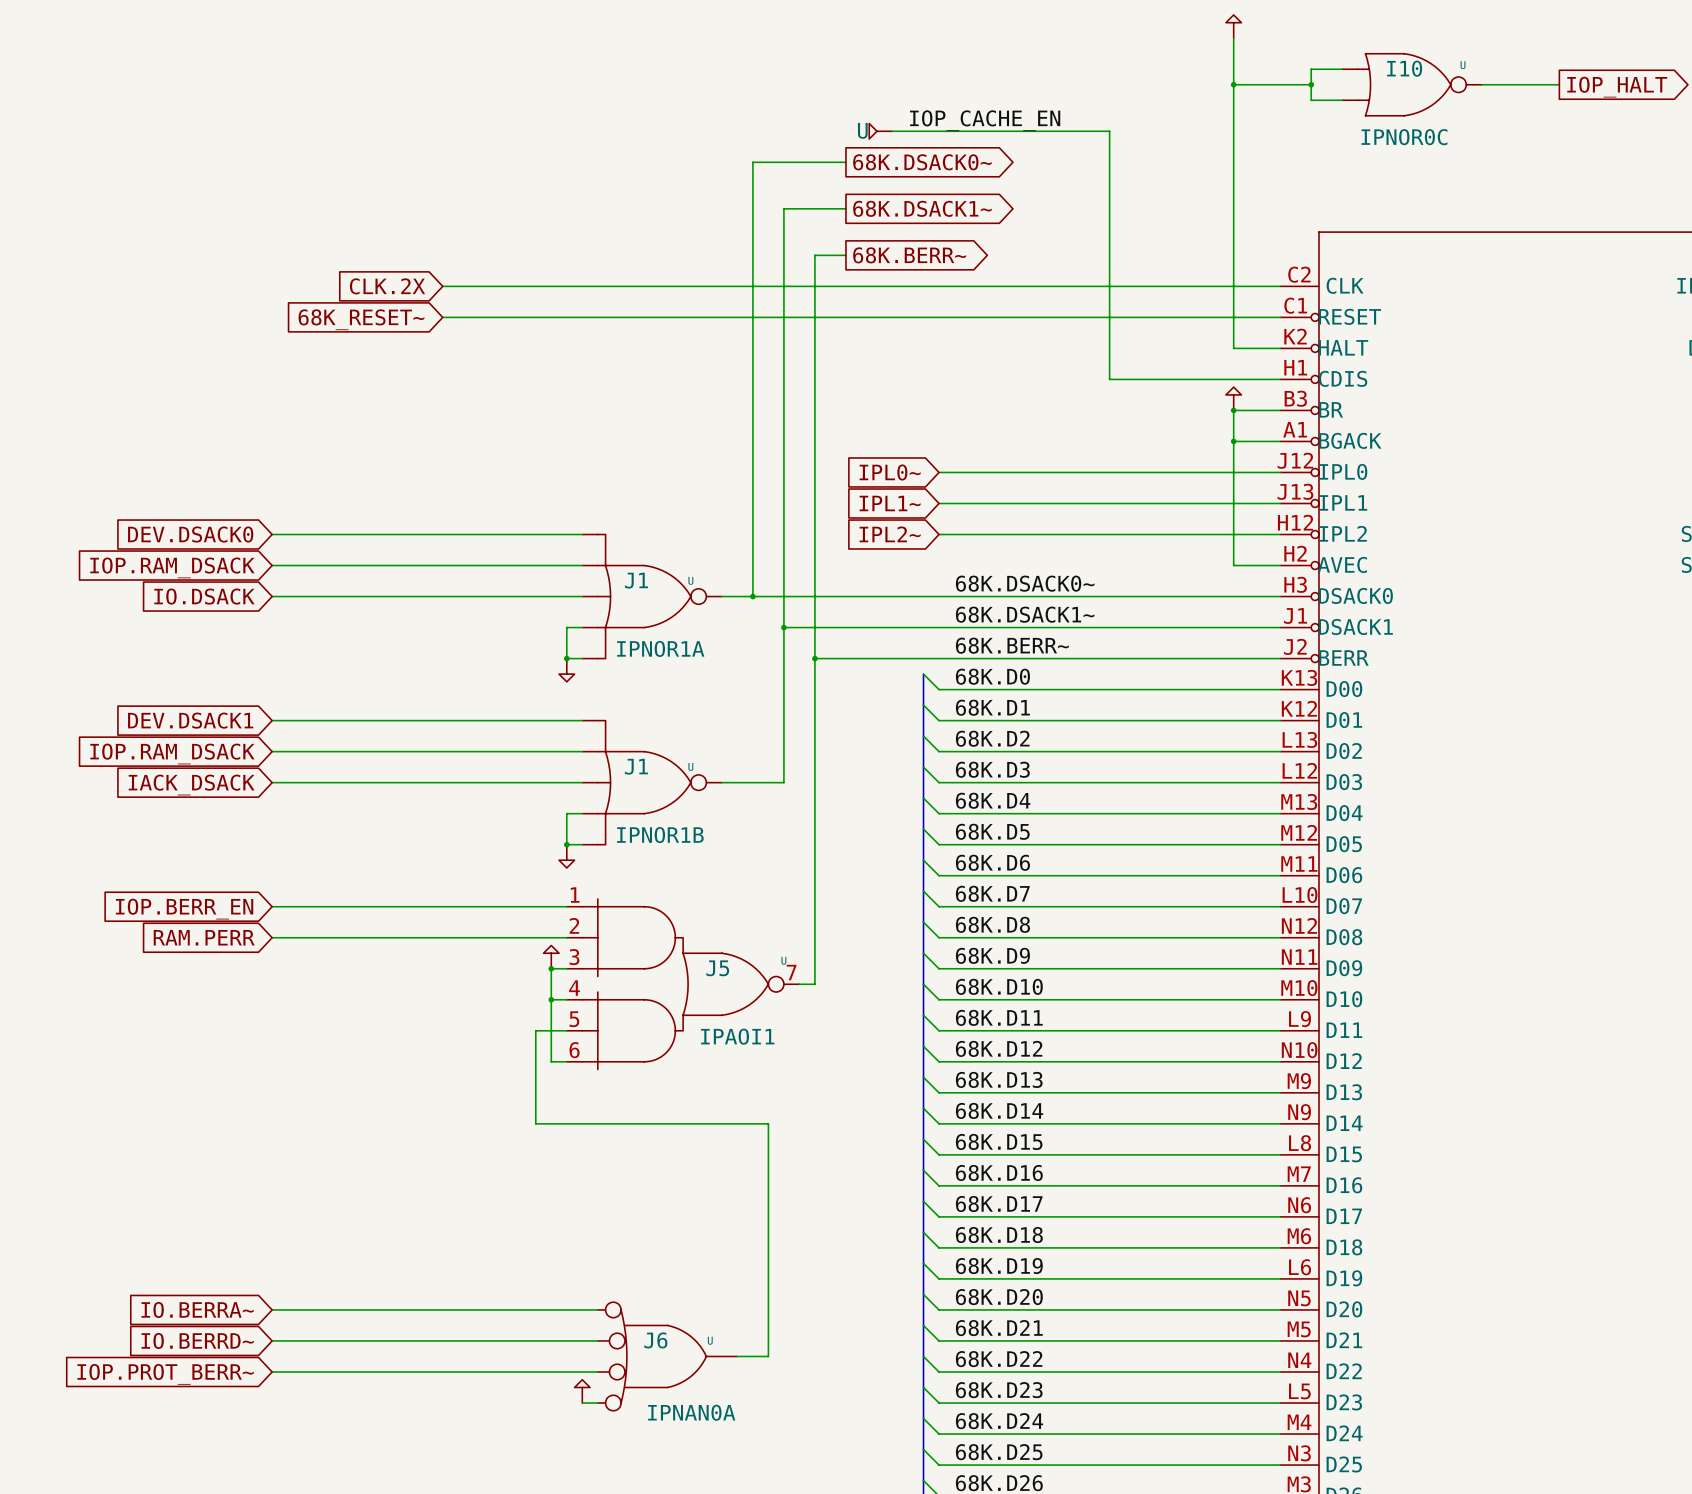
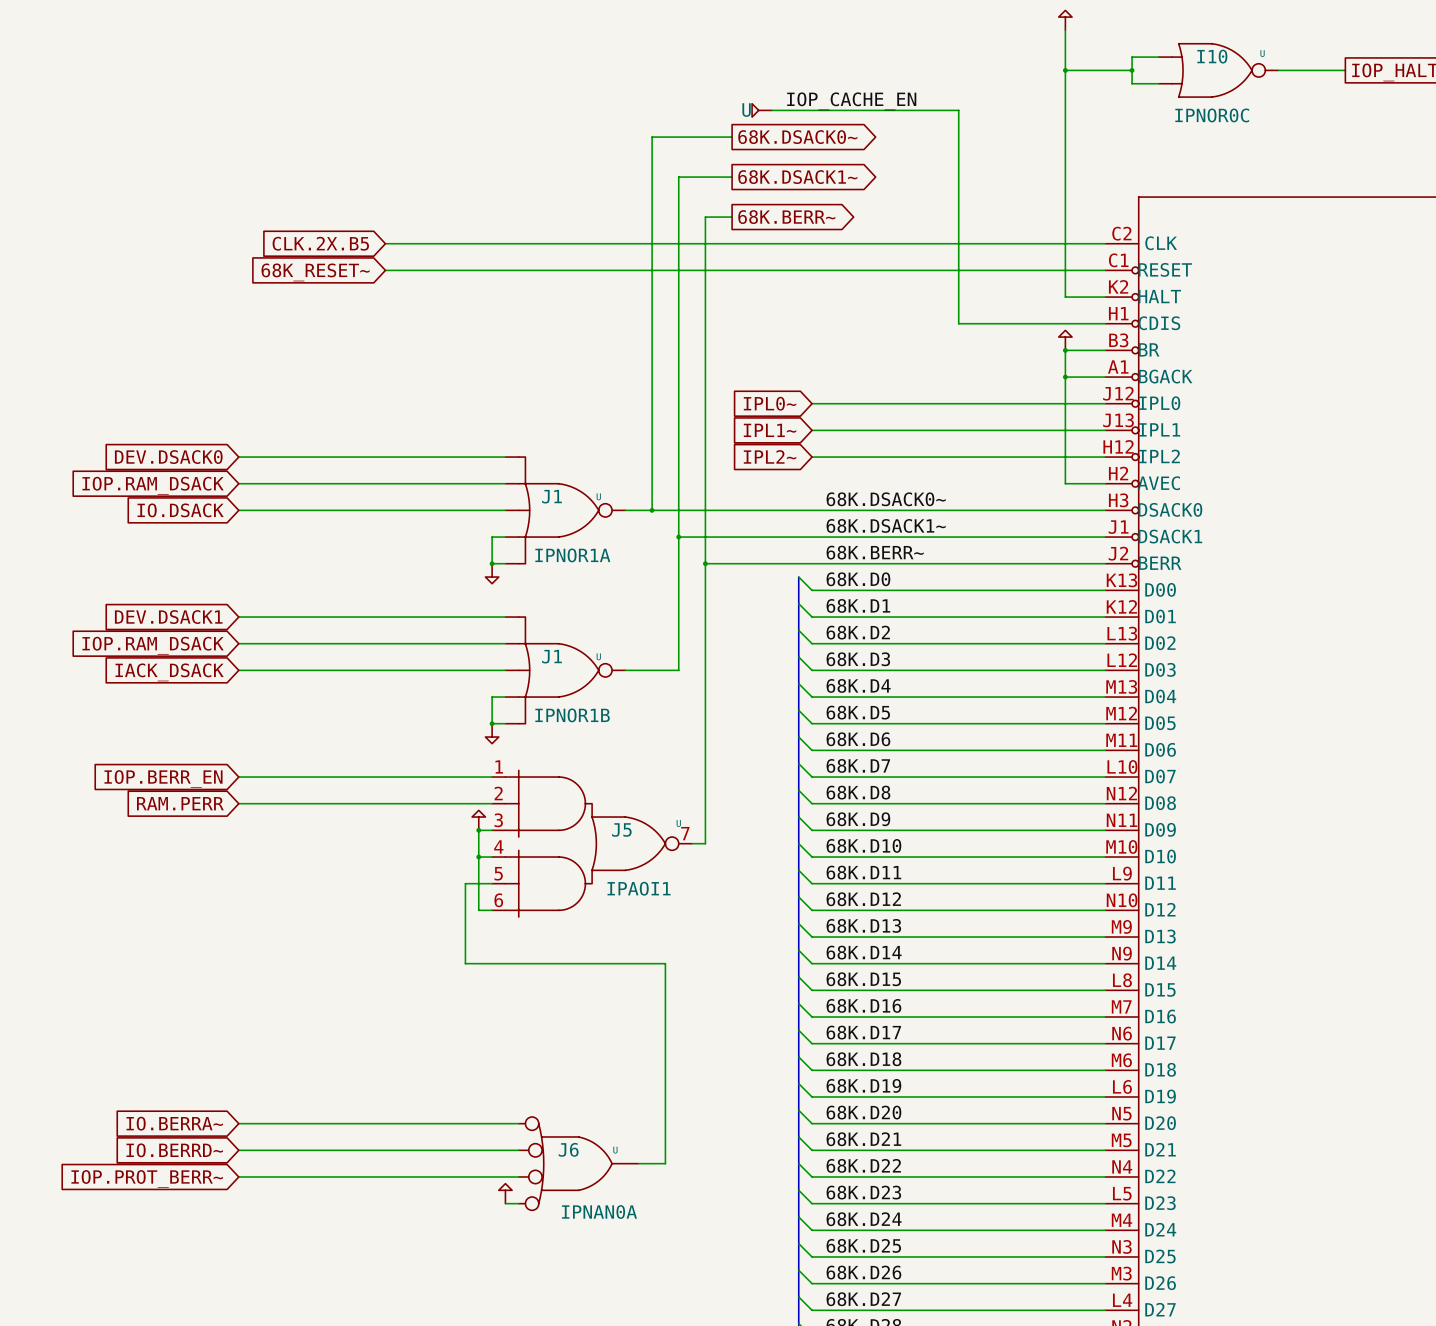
global label: CLK.2X (387, 286) -> CLK.2X.B5 (320, 243)

